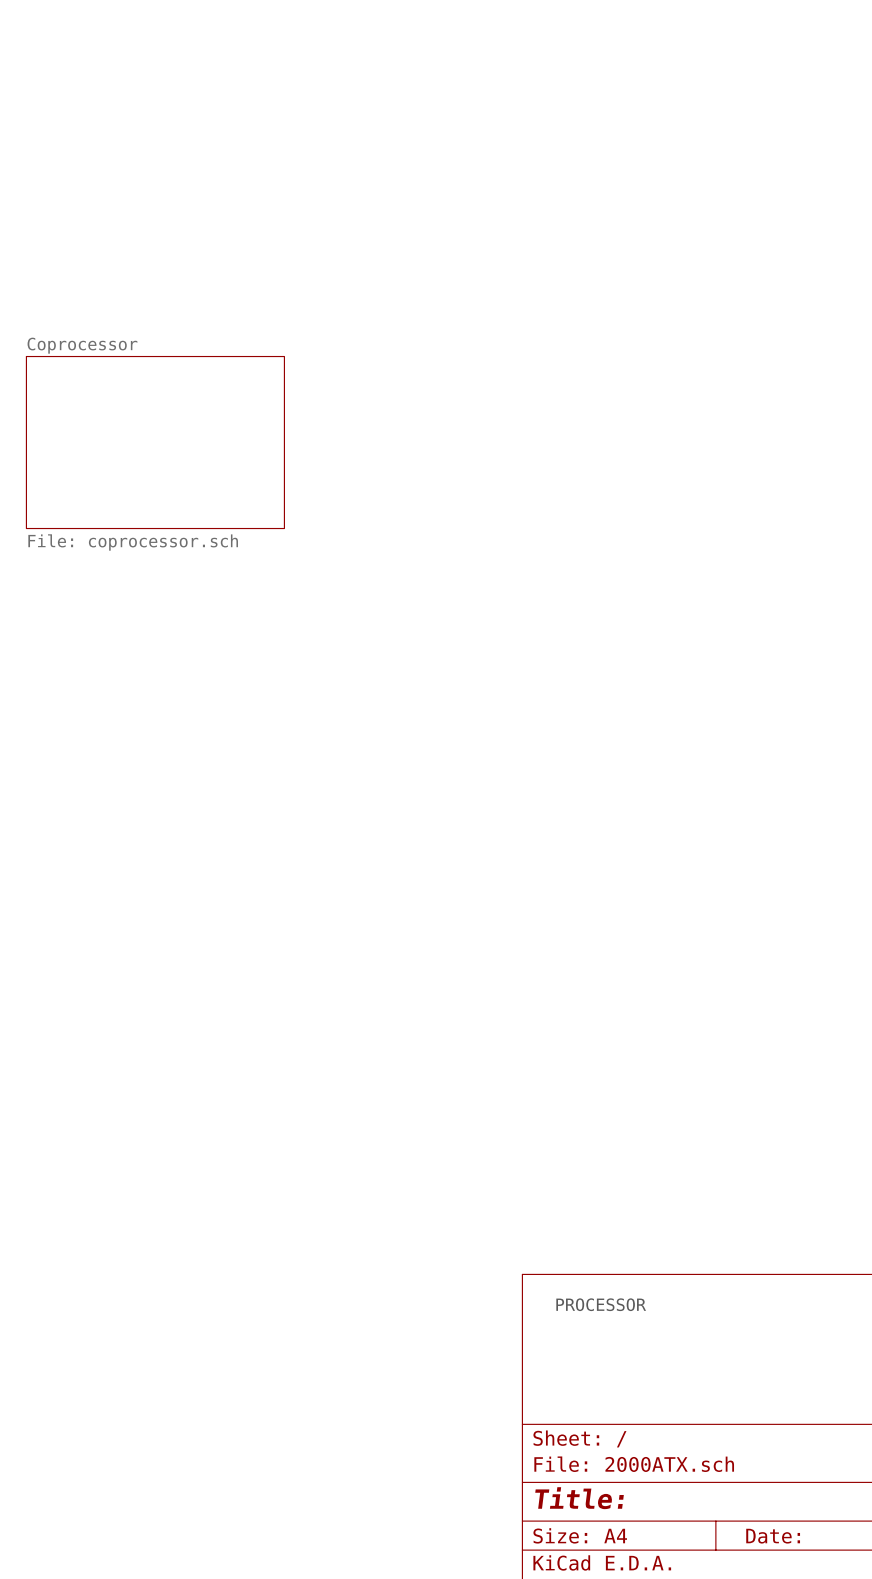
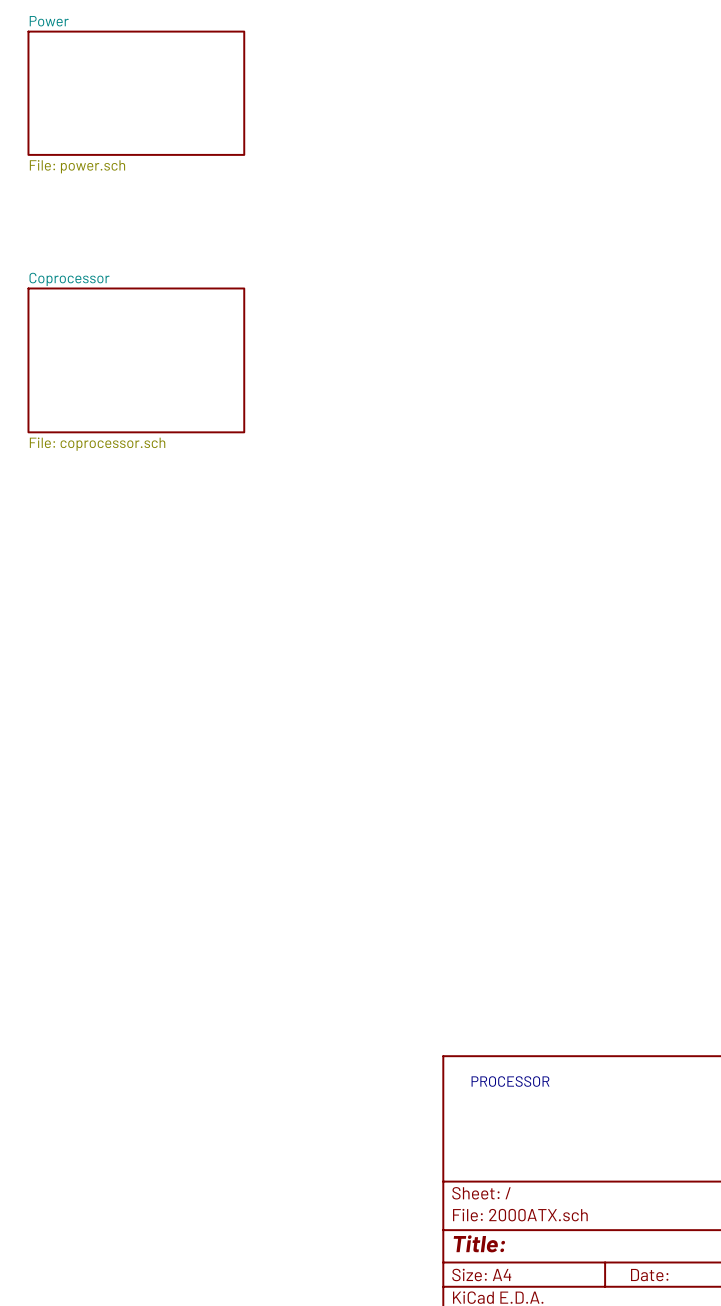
sheet Power: none -> File: power.sch (136, 93)

